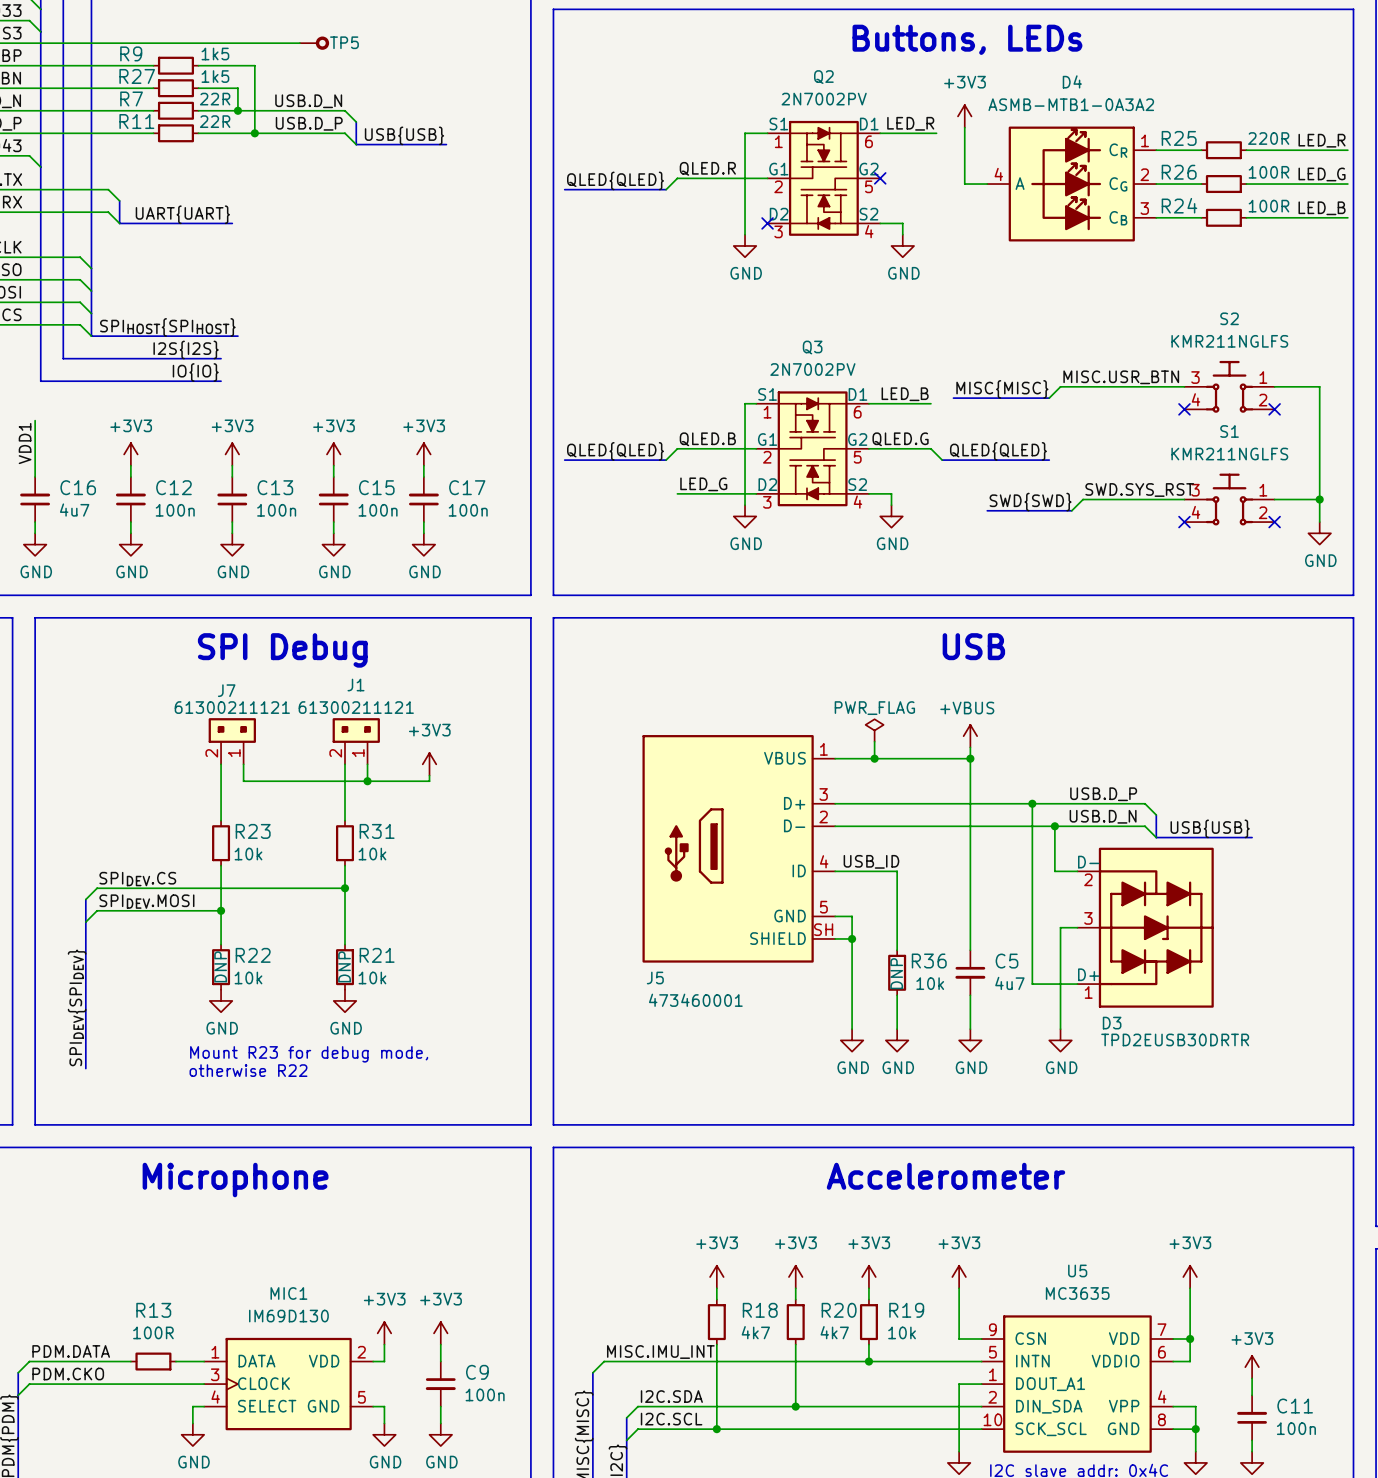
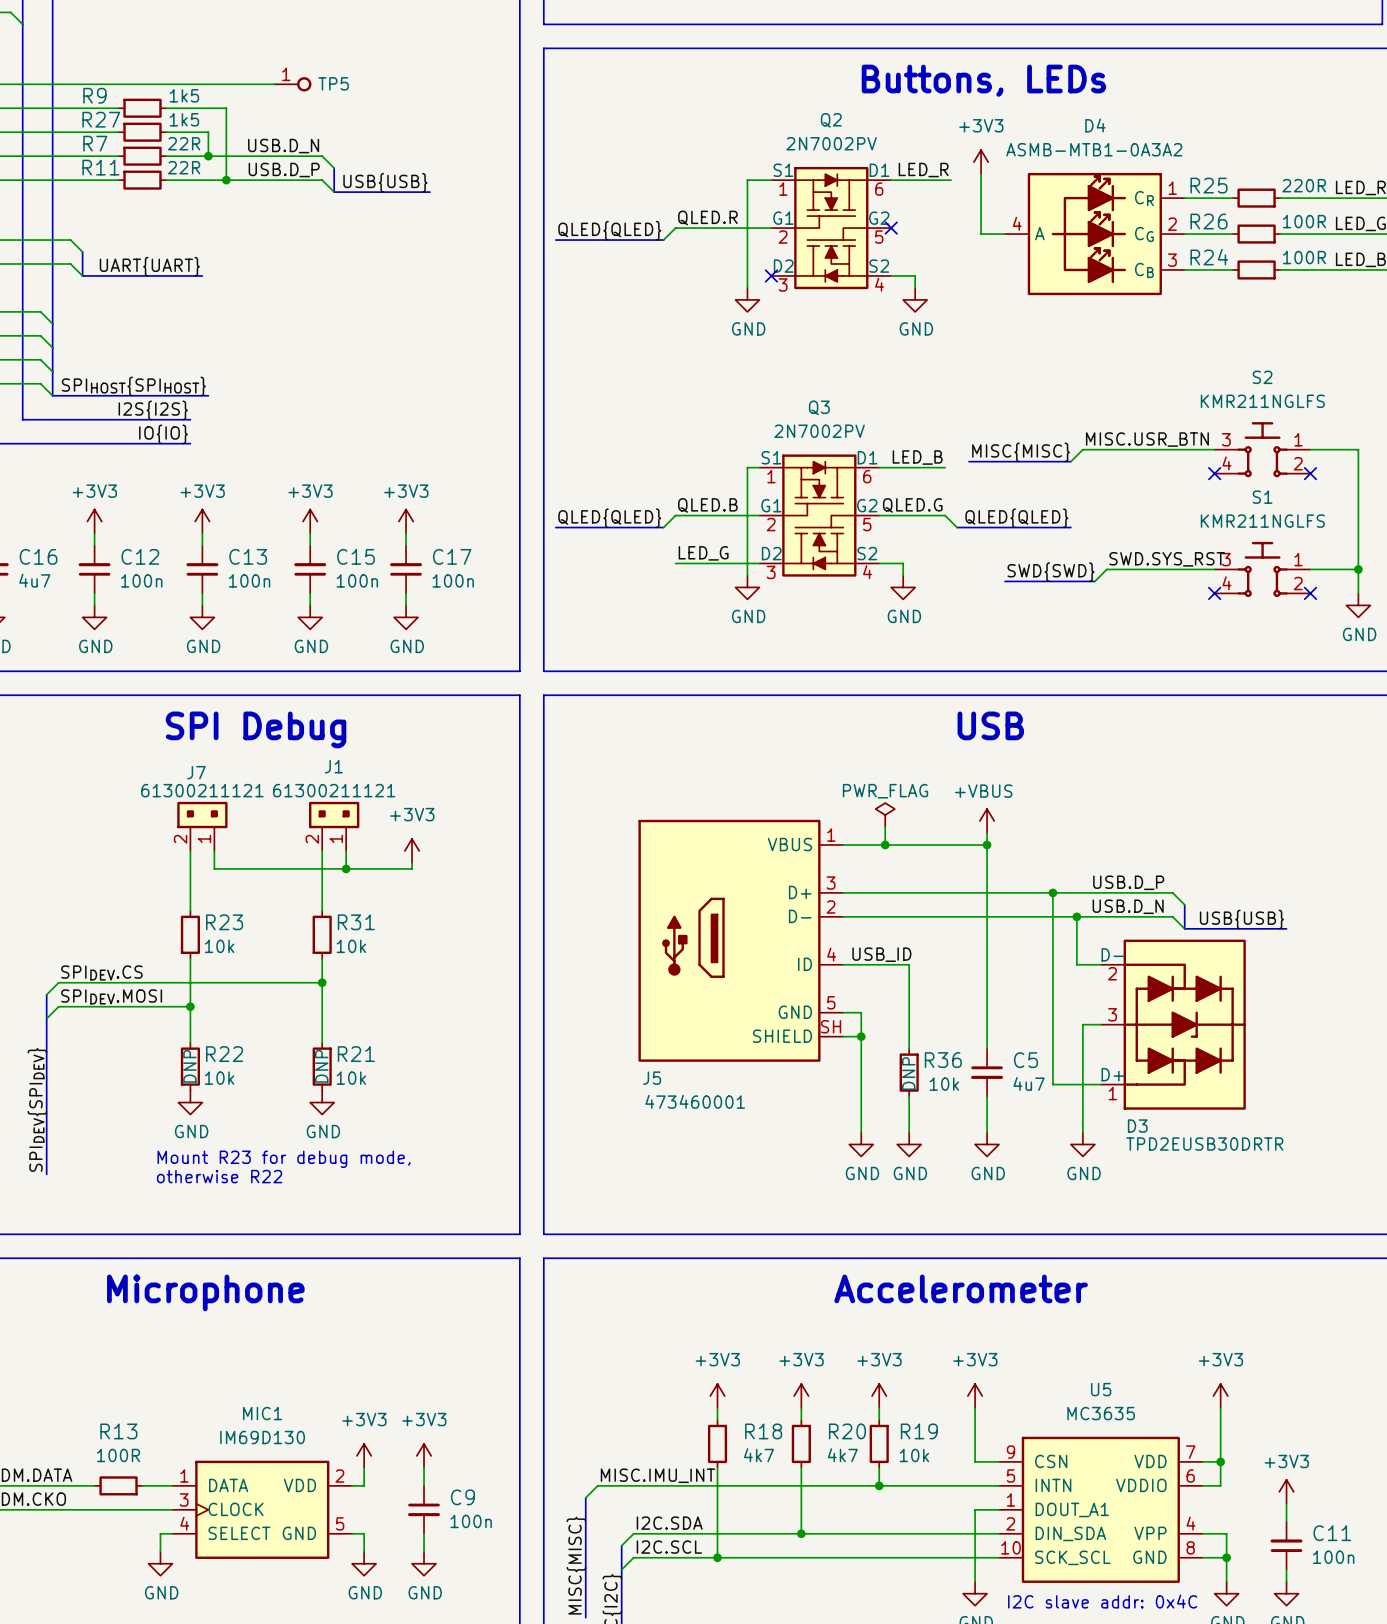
TP5 symbol: [299, 36, 330, 50] -> [274, 77, 312, 92]

